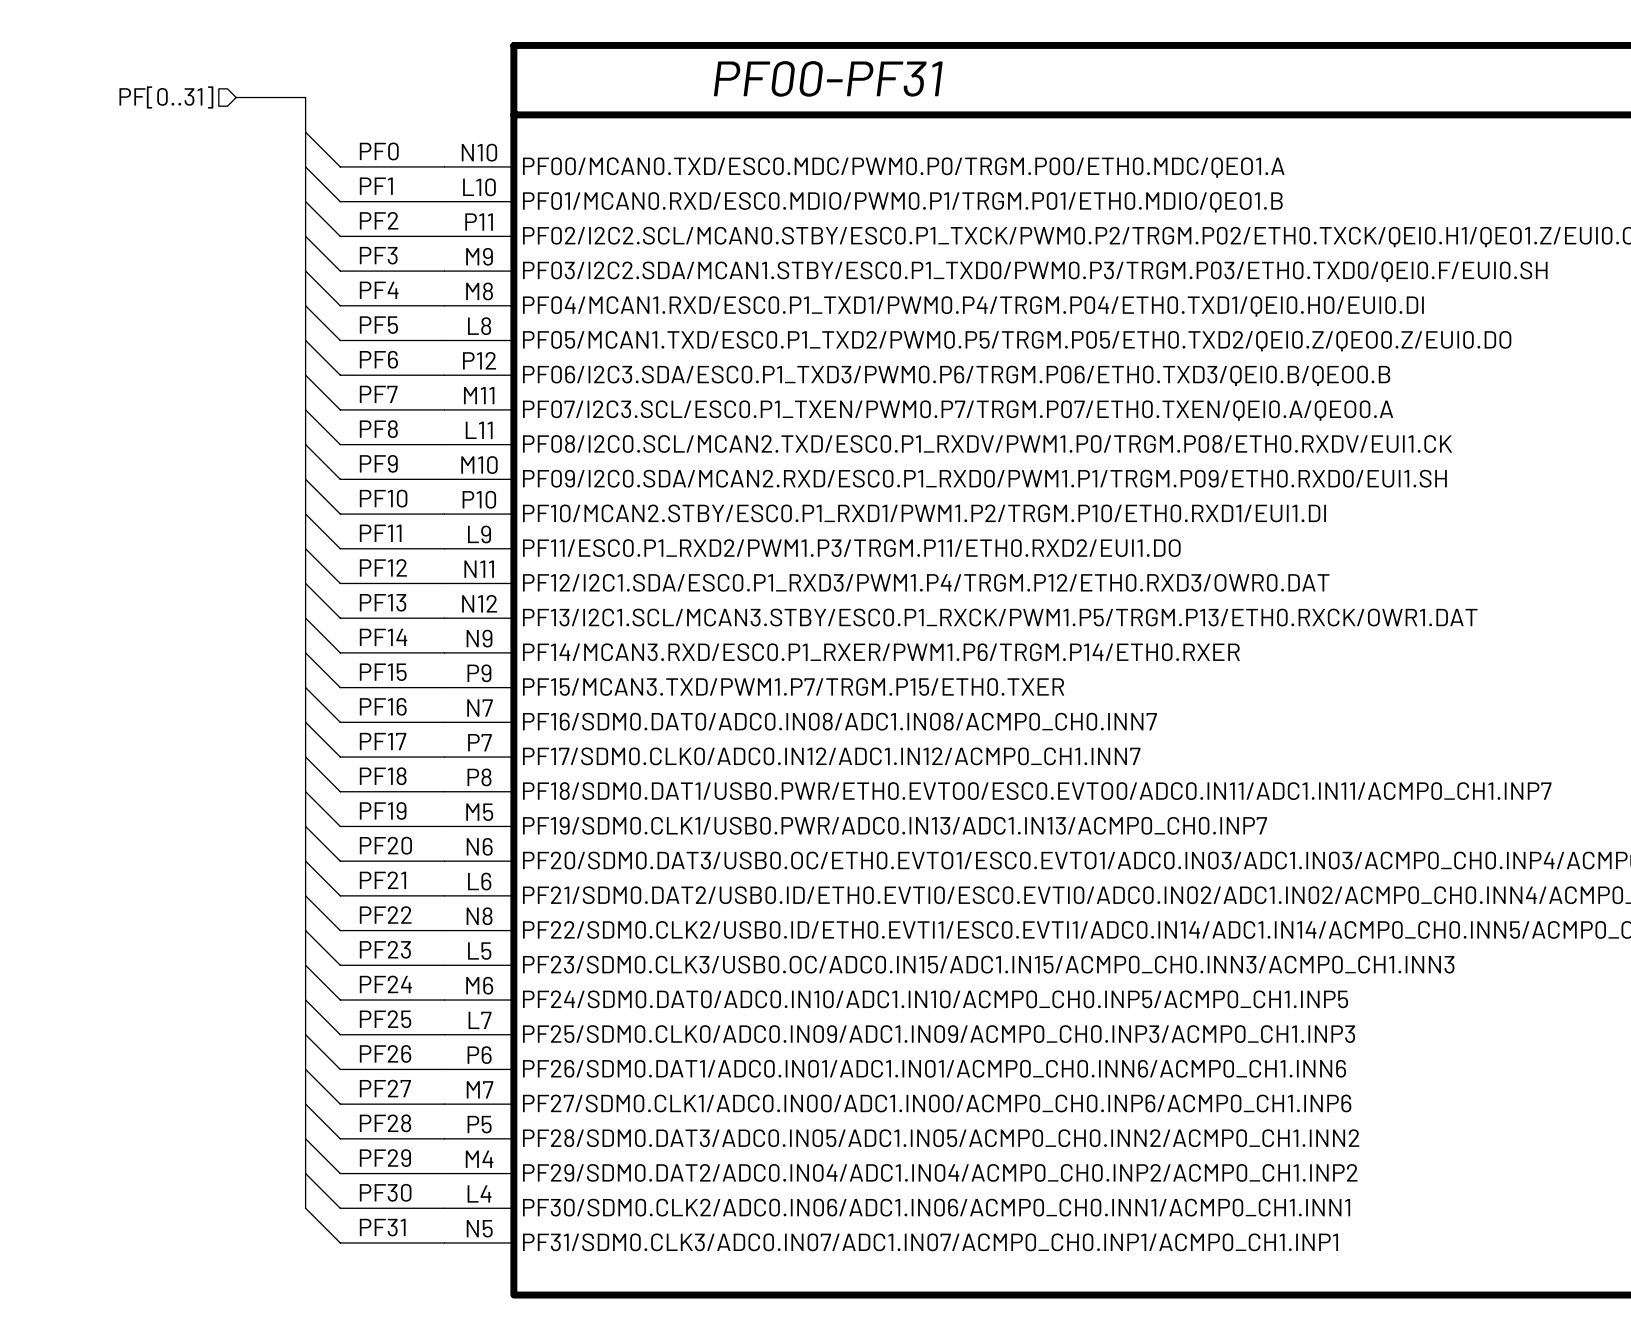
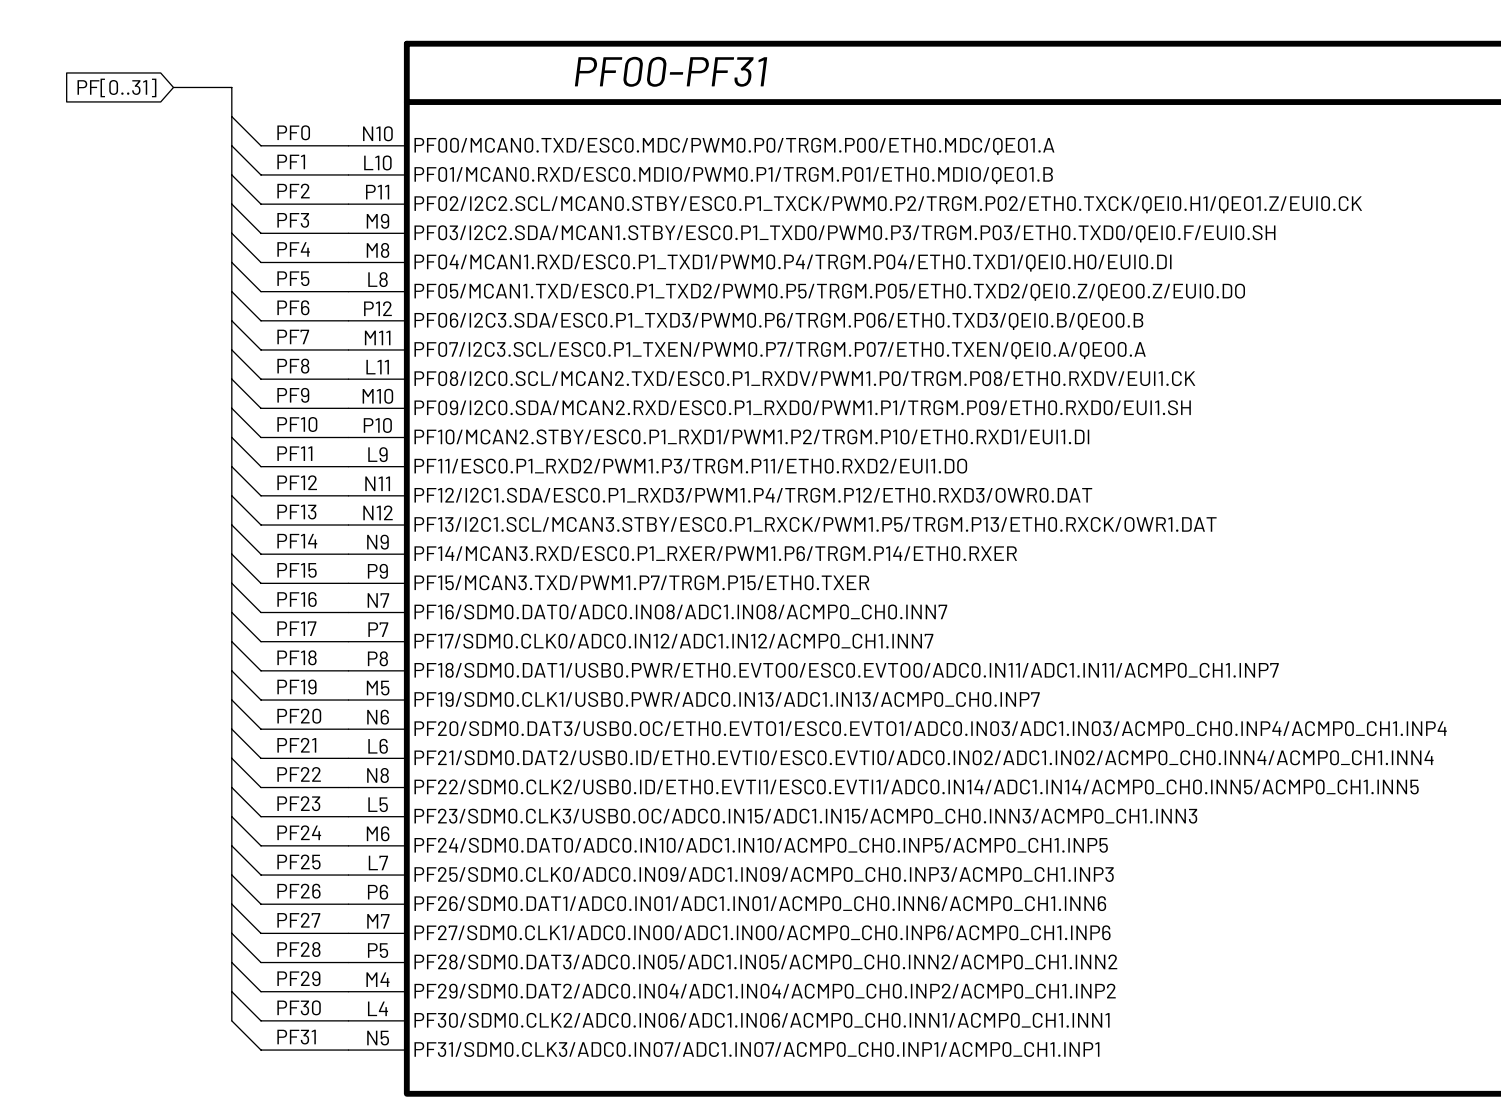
hierarchical label: PF[0..31] (166, 97) -> none
global label: none -> PF[0..31] (116, 87)

